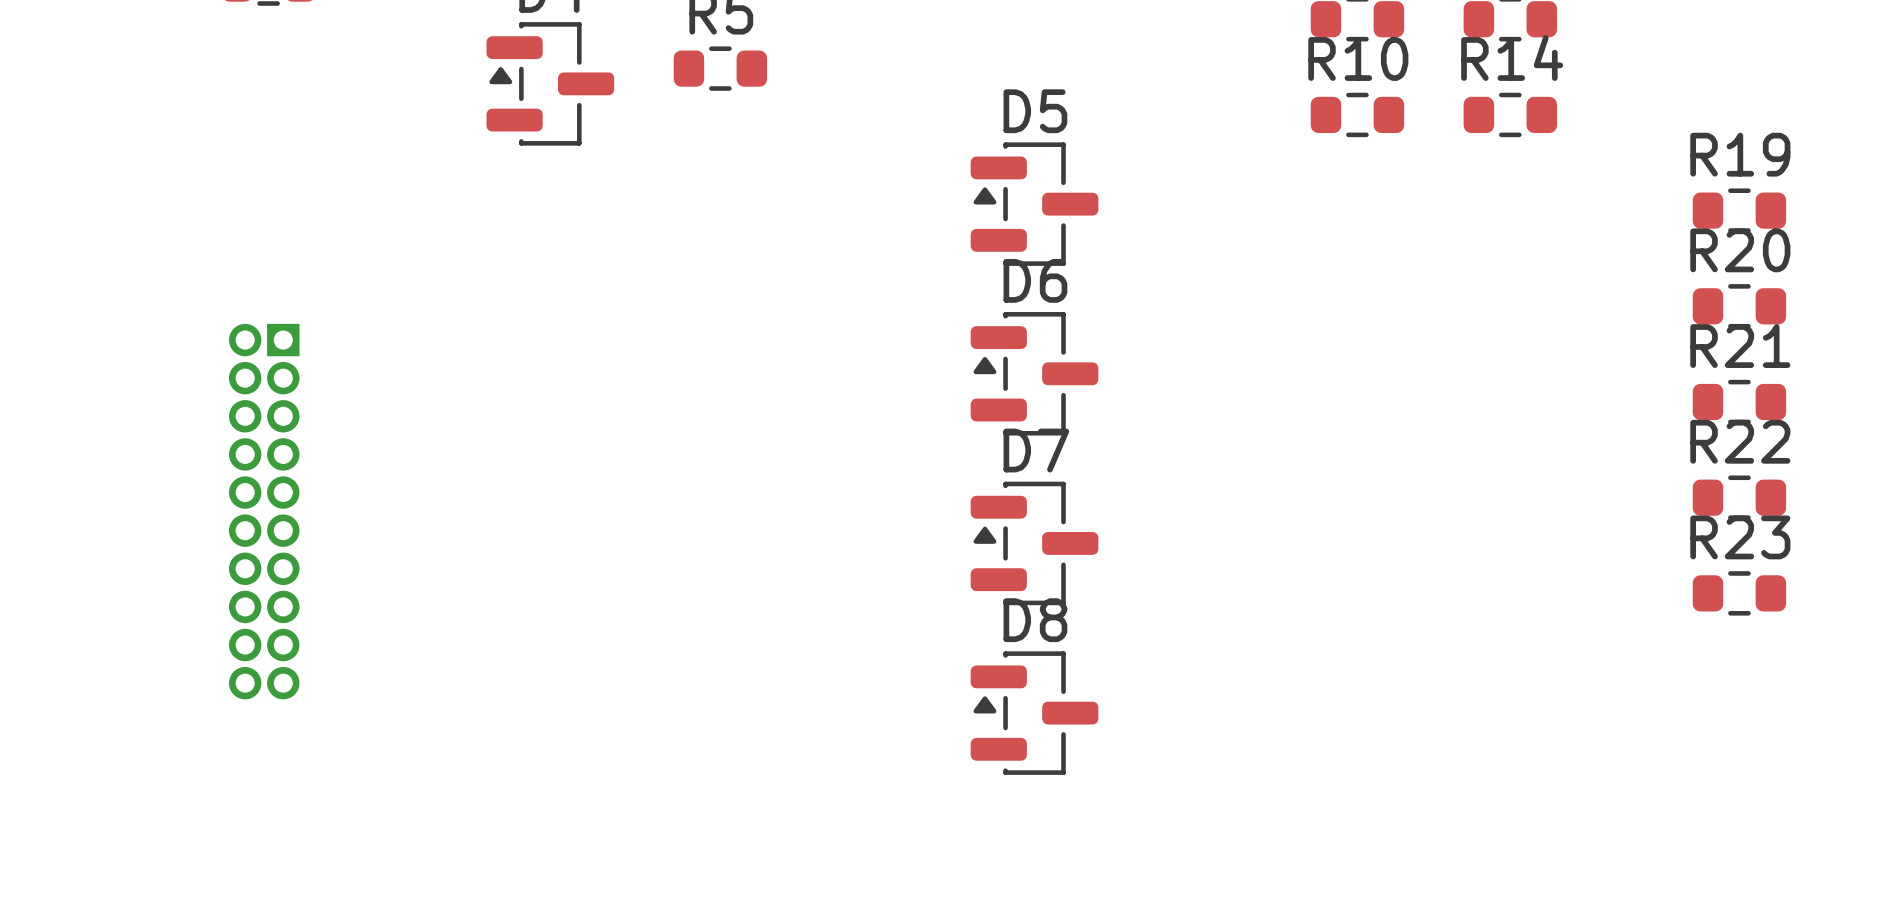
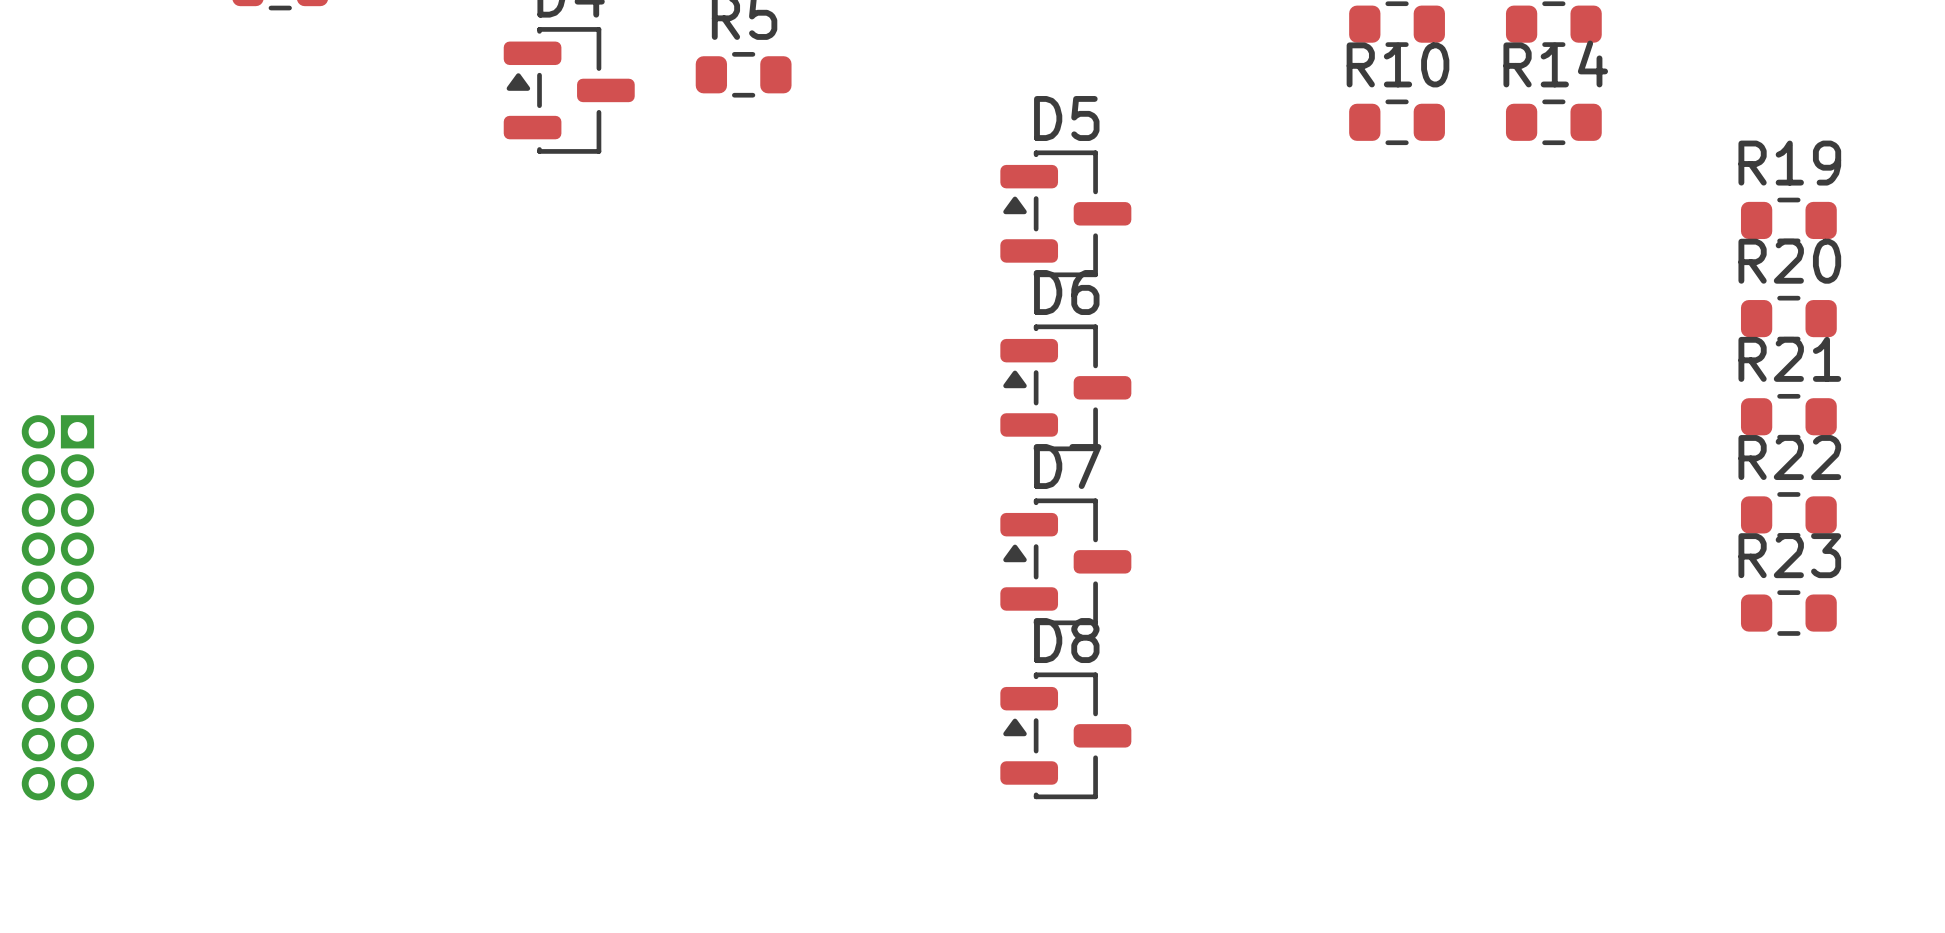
part position: (264, 511) -> (57, 607)

